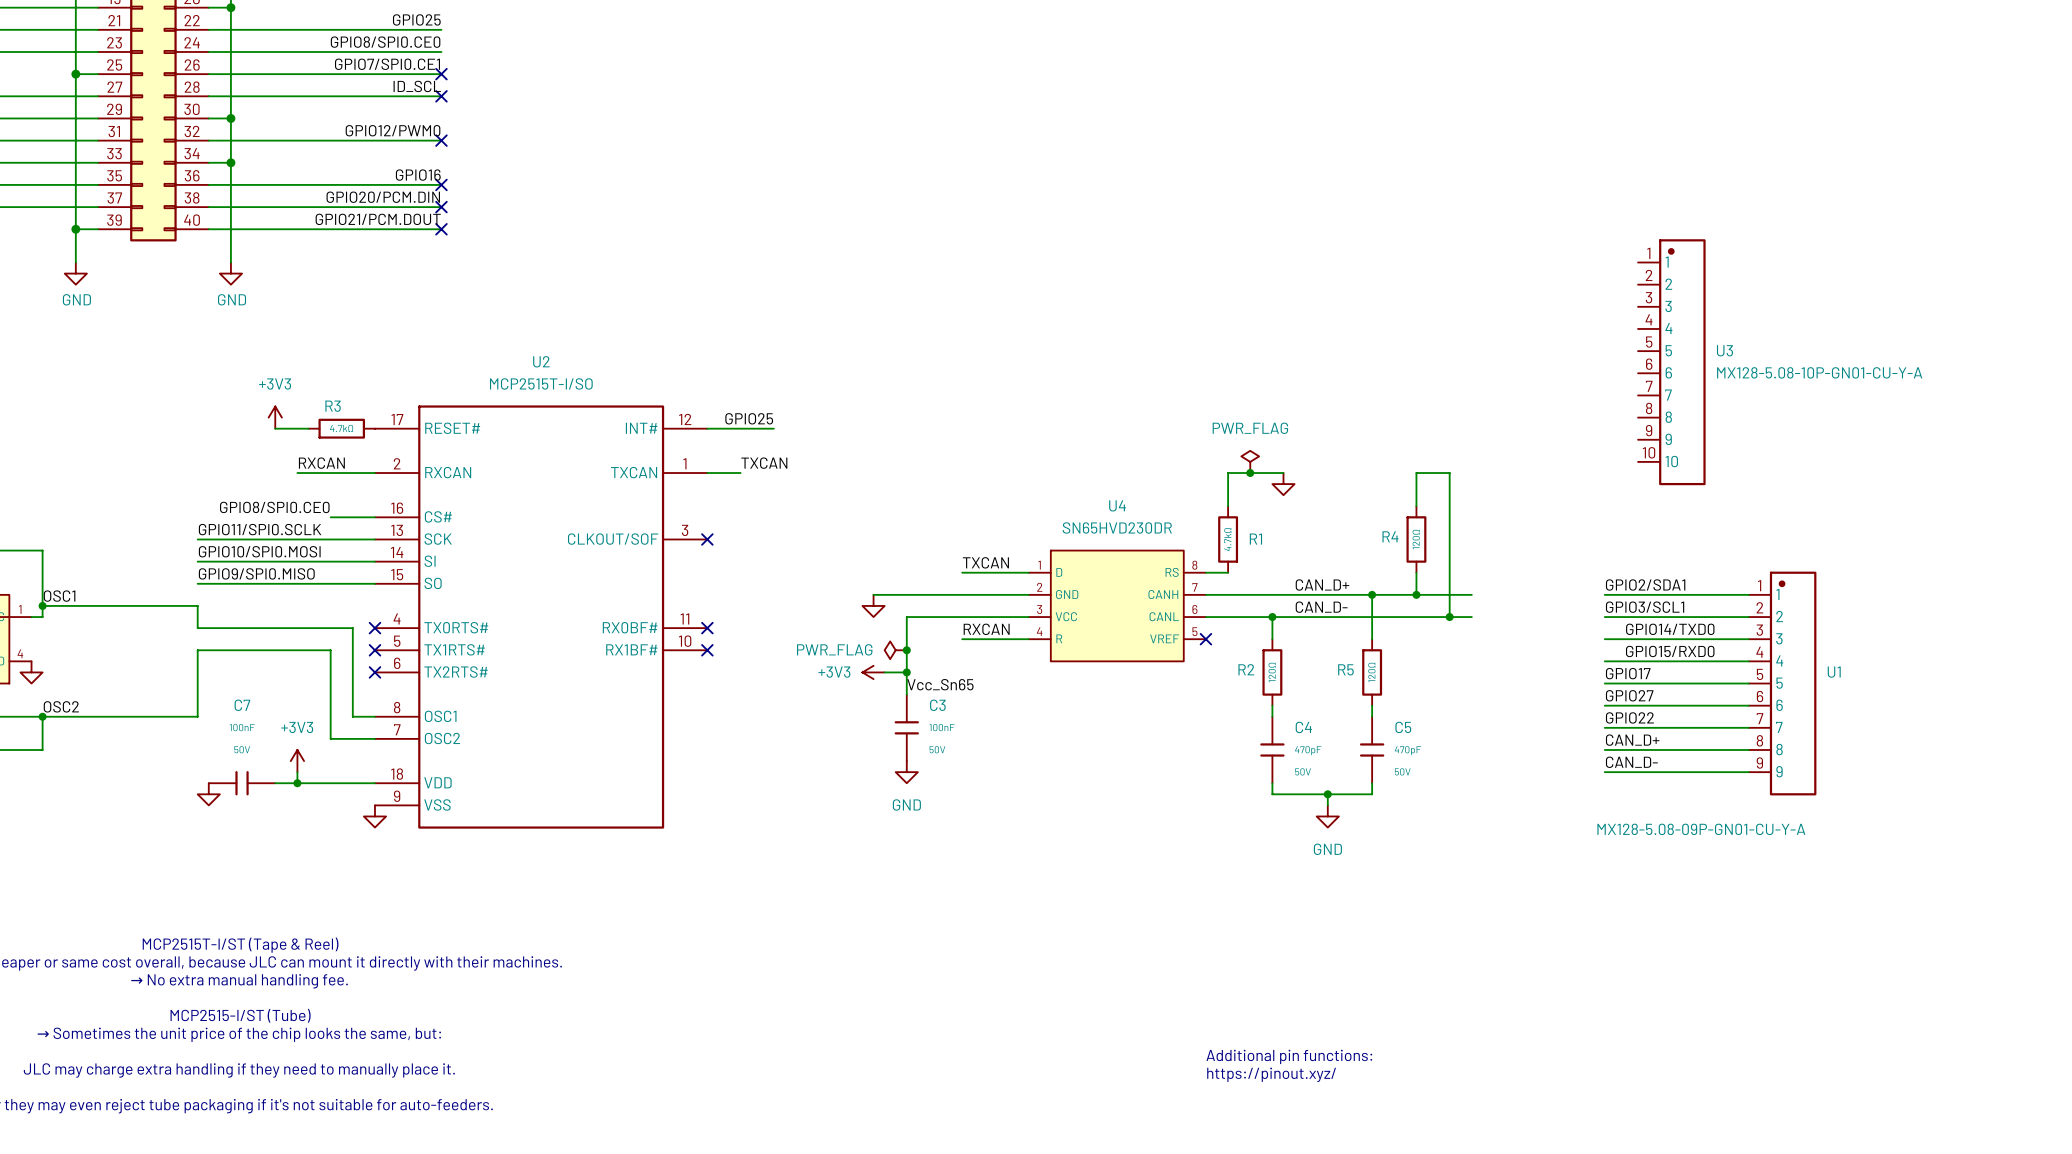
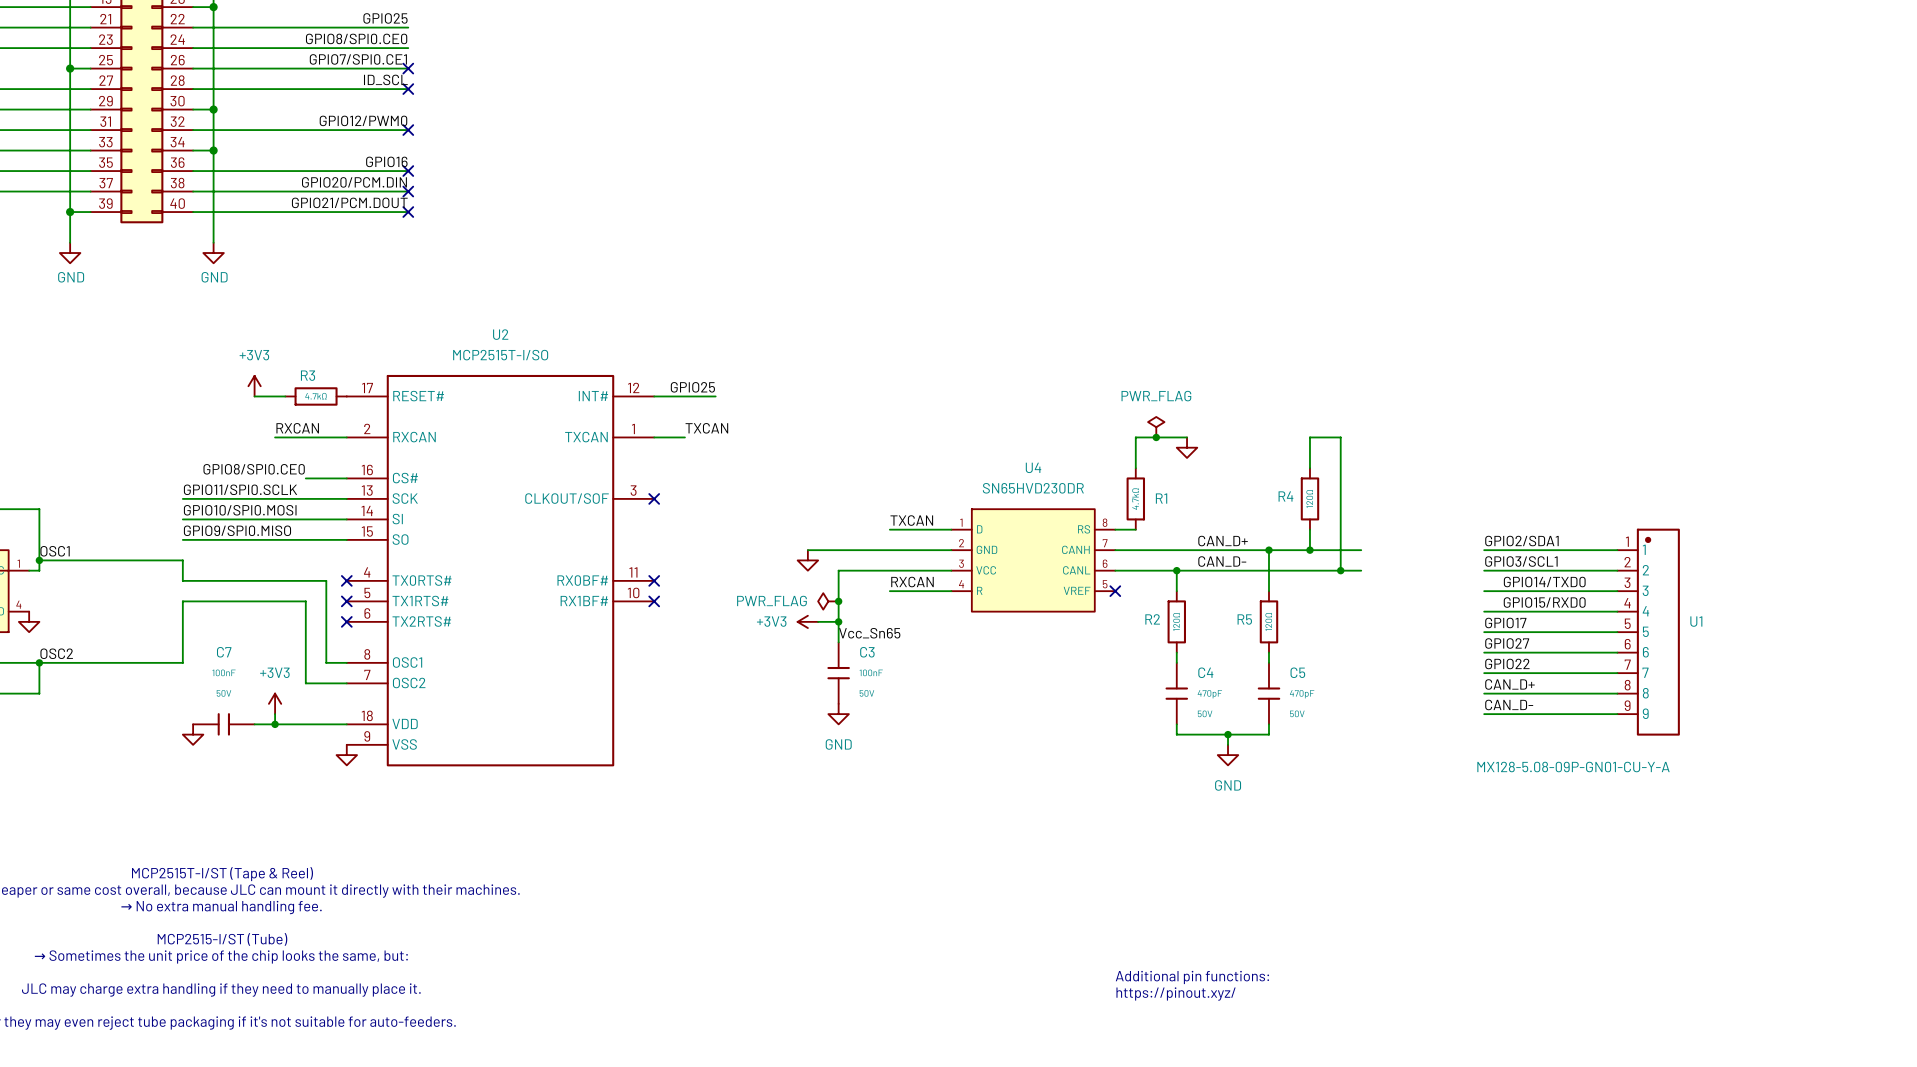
U3: MX128-5.08-10P-GN01-CU-Y-A (1671, 362) -> none

